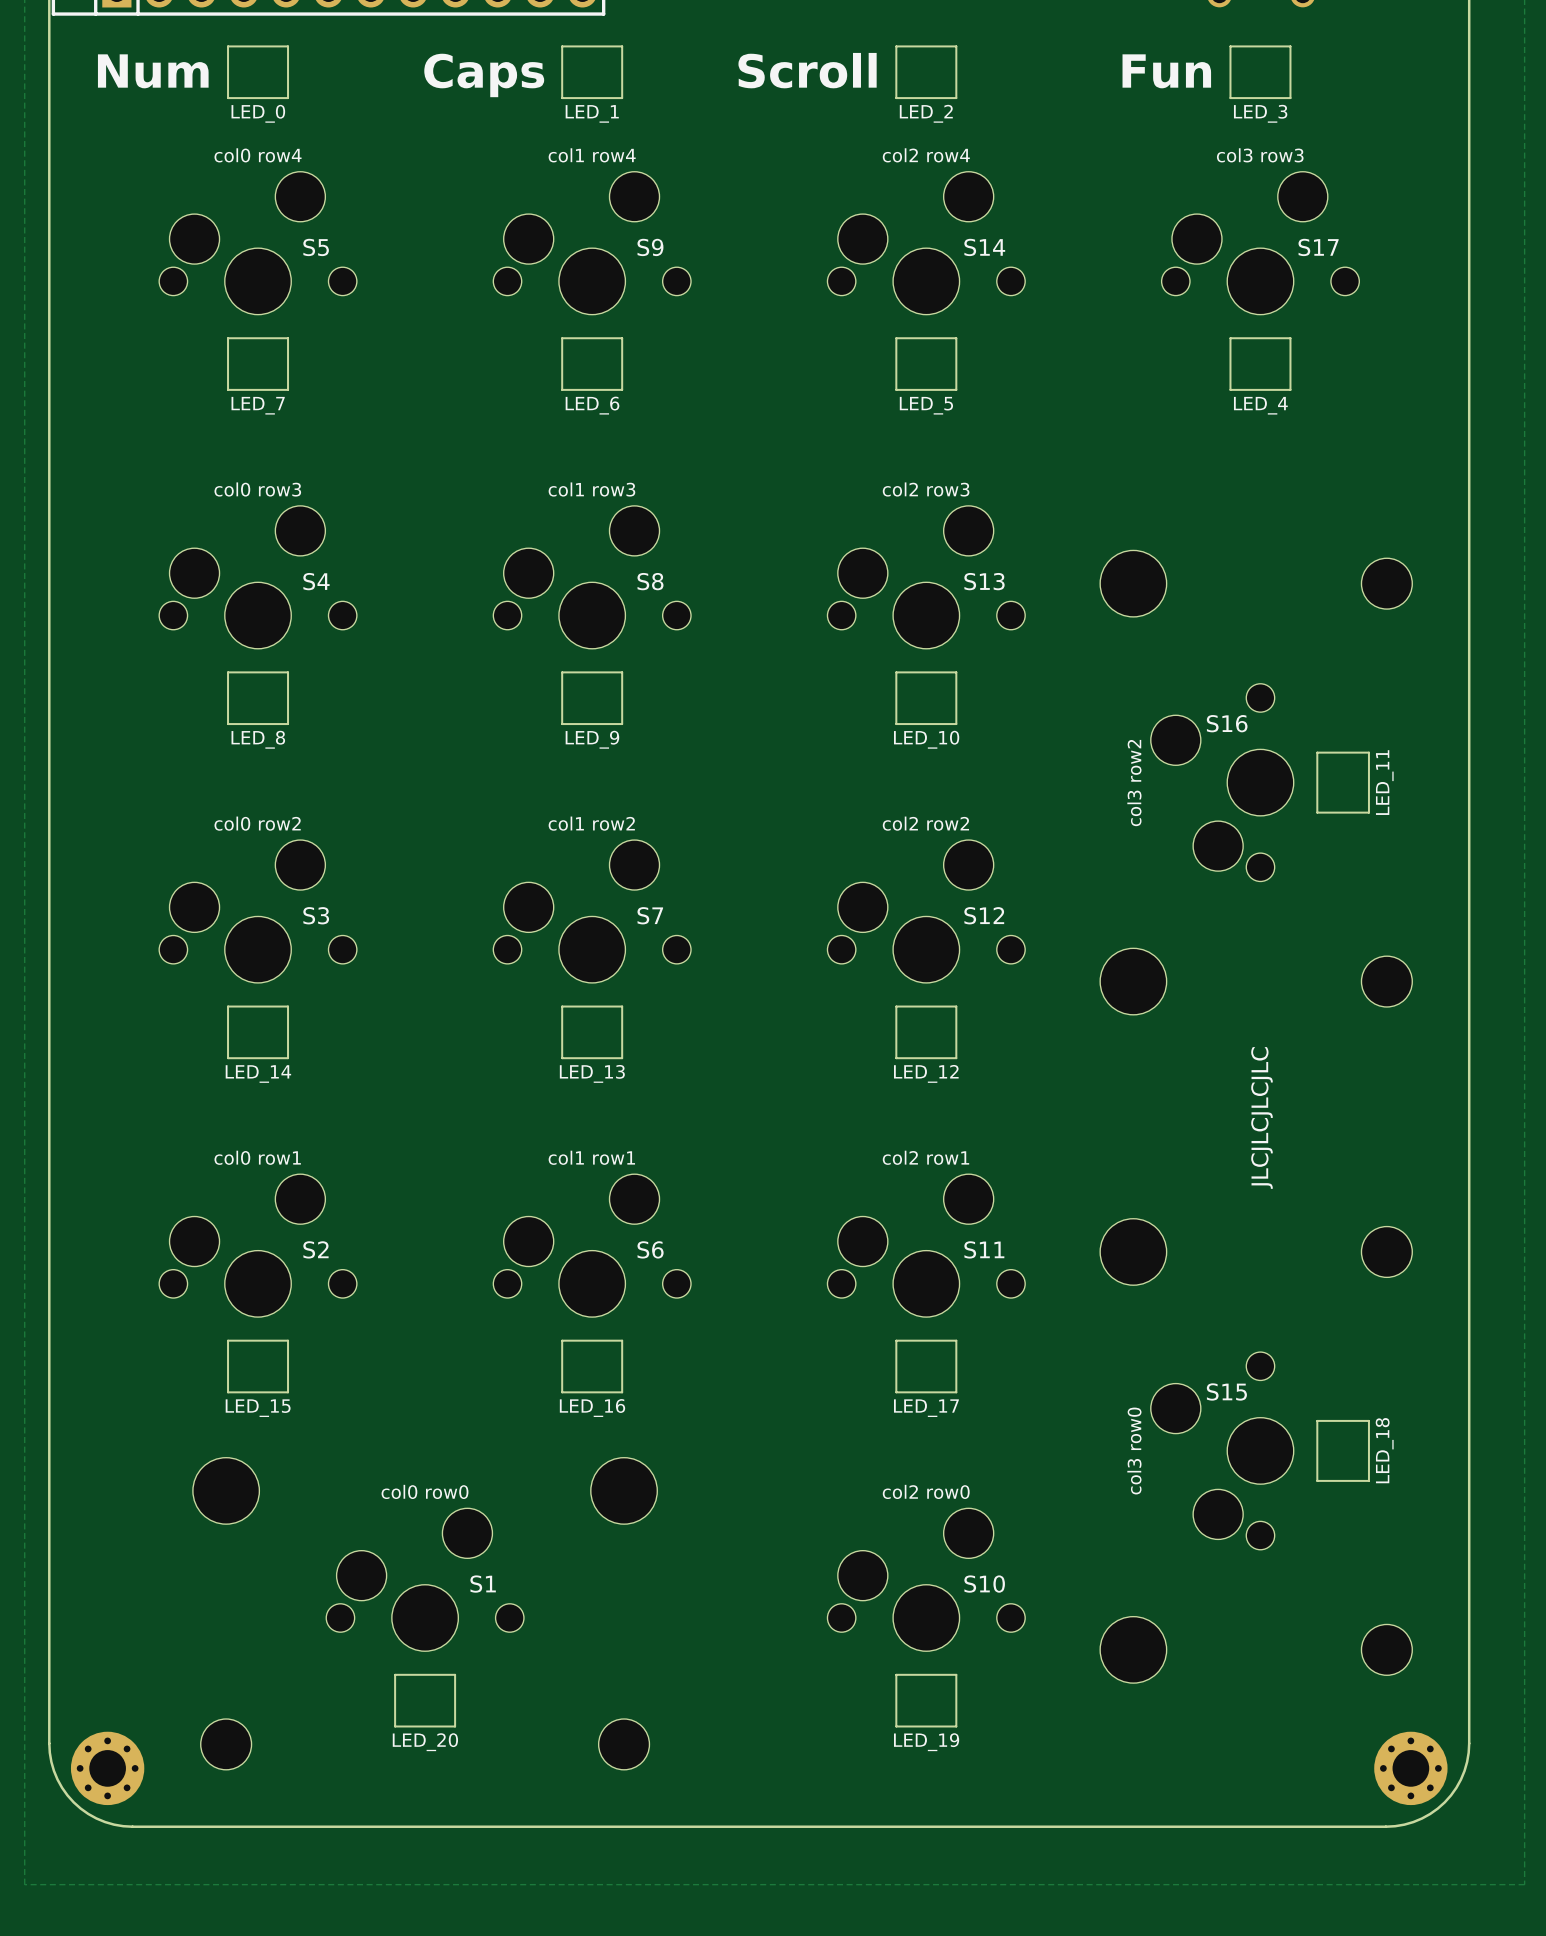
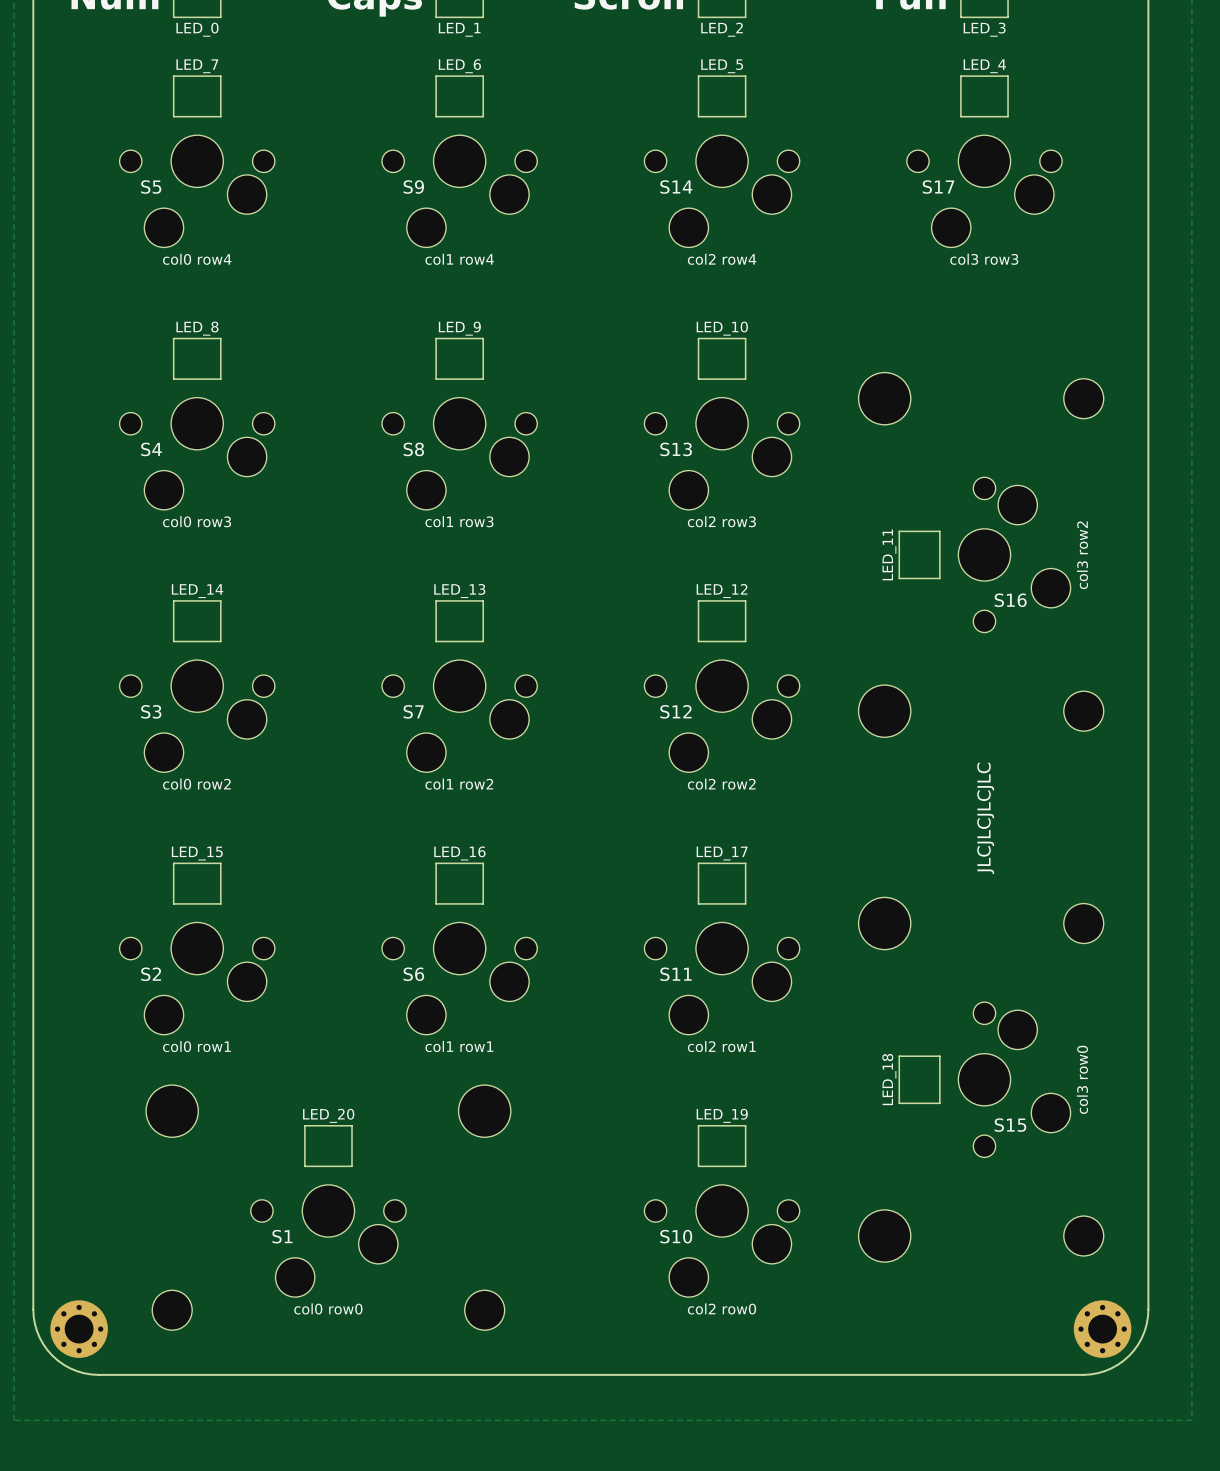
text position: col0 row4 (258, 155) -> col0 row4 (197, 259)
text position: col1 row4 (592, 155) -> col1 row4 (459, 259)
text position: col2 row4 (926, 155) -> col2 row4 (722, 259)
text position: col3 row3 (1260, 155) -> col3 row3 (984, 259)
part: none -> (197, 96)
part: none -> (459, 96)
part: none -> (722, 96)
S5 rotation: 0° (258, 243) -> 180° (197, 191)
S9 rotation: 0° (592, 243) -> 180° (459, 191)
S14 rotation: 0° (926, 243) -> 180° (722, 191)
S17 rotation: 0° (1260, 243) -> 180° (984, 191)
part: (258, 364) -> none
part: (592, 364) -> none
part: (926, 364) -> none
part position: (1260, 364) -> (984, 96)
text position: LED_7 (258, 405) -> LED_7 (197, 66)
text position: LED_6 (592, 405) -> LED_6 (459, 66)
text position: LED_5 (926, 405) -> LED_5 (722, 66)
text position: LED_4 (1260, 405) -> LED_4 (984, 66)
text position: col0 row3 (257, 489) -> col0 row3 (197, 521)
text position: col1 row3 (591, 489) -> col1 row3 (459, 521)
text position: col2 row3 (926, 489) -> col2 row3 (721, 521)
part: none -> (197, 358)
part: none -> (459, 358)
part: none -> (722, 358)
S4 rotation: 0° (258, 577) -> 180° (197, 453)
S8 rotation: 0° (592, 577) -> 180° (459, 453)
S13 rotation: 0° (926, 577) -> 180° (722, 453)
part: (258, 698) -> none
part: (592, 698) -> none
part: (926, 698) -> none
text position: LED_8 (258, 739) -> LED_8 (197, 328)
text position: LED_9 (592, 739) -> LED_9 (459, 328)
text position: LED_10 (926, 739) -> LED_10 (722, 328)
part: none -> (919, 554)
S16 rotation: 0° (1222, 782) -> 180° (1014, 554)
part: (1343, 782) -> none
text position: LED_11 (1384, 782) -> LED_11 (889, 554)
text position: col3 row2 (1134, 783) -> col3 row2 (1082, 555)
text position: col0 row2 (257, 823) -> col0 row2 (196, 784)
text position: col1 row2 (591, 823) -> col1 row2 (459, 784)
text position: col2 row2 (925, 823) -> col2 row2 (721, 784)
part: none -> (197, 621)
part: none -> (459, 621)
part: none -> (722, 621)
S3 rotation: 0° (258, 911) -> 180° (197, 716)
S7 rotation: 0° (592, 911) -> 180° (459, 716)
S12 rotation: 0° (926, 911) -> 180° (722, 716)
part: (258, 1032) -> none
part: (592, 1032) -> none
part: (926, 1032) -> none
text position: LED_13 (592, 1073) -> LED_13 (459, 591)
text position: LED_12 (926, 1073) -> LED_12 (722, 591)
text position: LED_14 (258, 1074) -> LED_14 (197, 591)
text position: col0 row1 (257, 1157) -> col0 row1 (196, 1046)
text position: col1 row1 (591, 1157) -> col1 row1 (459, 1046)
text position: col2 row1 (925, 1157) -> col2 row1 (721, 1046)
part: none -> (197, 883)
part: none -> (459, 883)
part: none -> (722, 883)
S2 rotation: 0° (258, 1245) -> 180° (197, 978)
S6 rotation: 0° (592, 1245) -> 180° (459, 978)
S11 rotation: 0° (926, 1245) -> 180° (722, 978)
part: (258, 1366) -> none
part: (592, 1366) -> none
part: (926, 1366) -> none
text position: LED_15 (258, 1408) -> LED_15 (197, 853)
text position: LED_16 (592, 1408) -> LED_16 (459, 853)
text position: LED_17 (926, 1408) -> LED_17 (722, 853)
part: none -> (919, 1079)
S15 rotation: 0° (1222, 1450) -> 180° (1014, 1079)
part: (1343, 1450) -> none
text position: LED_18 (1384, 1450) -> LED_18 (889, 1079)
text position: col3 row0 (1134, 1451) -> col3 row0 (1082, 1079)
text position: col0 row0 (425, 1491) -> col0 row0 (328, 1308)
text position: col2 row0 (926, 1491) -> col2 row0 (721, 1308)
part: none -> (328, 1146)
part: none -> (722, 1146)
S1 rotation: 0° (425, 1579) -> 180° (328, 1240)
S10 rotation: 0° (926, 1579) -> 180° (722, 1240)
part: (425, 1700) -> none
part: (926, 1700) -> none
text position: LED_20 (425, 1742) -> LED_20 (328, 1115)
text position: LED_19 (926, 1742) -> LED_19 (722, 1115)

